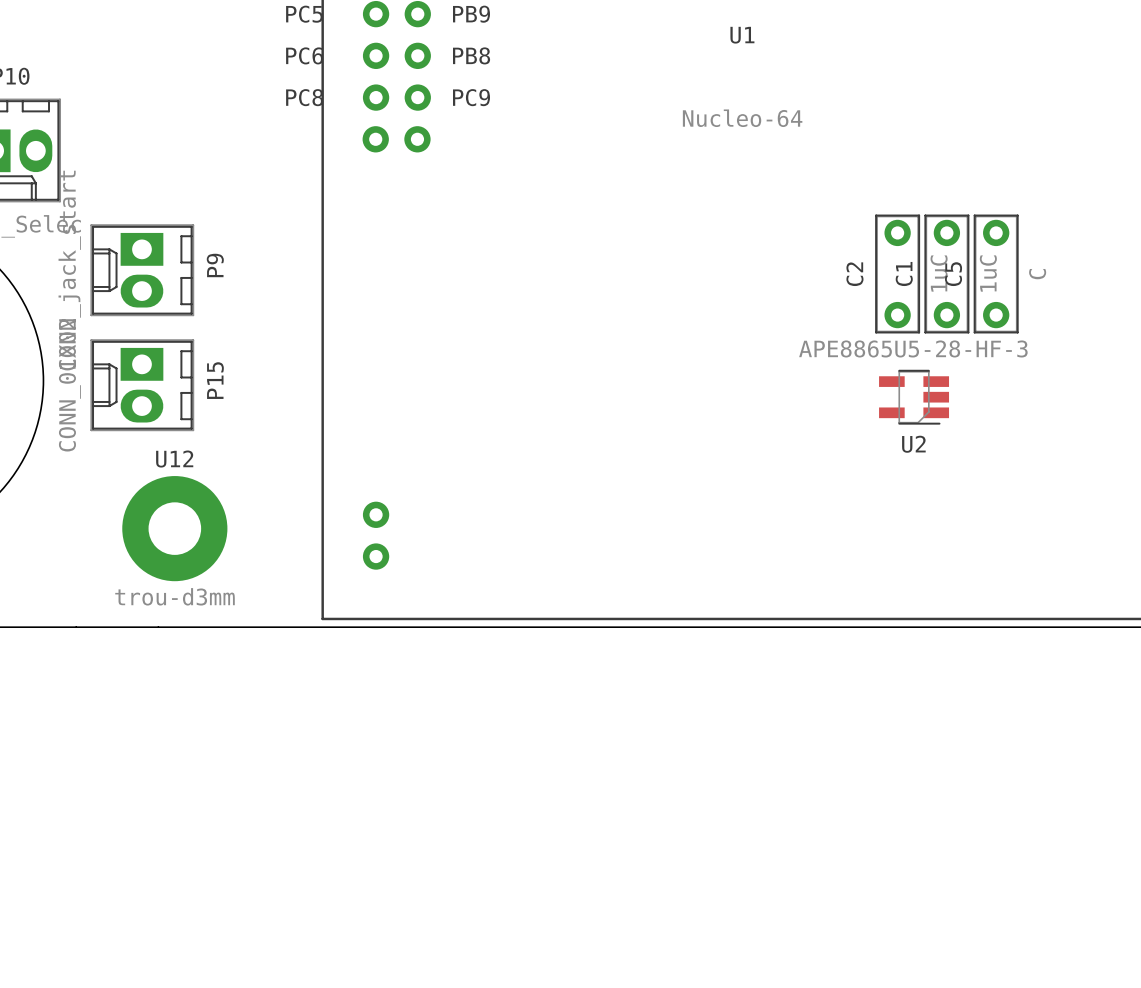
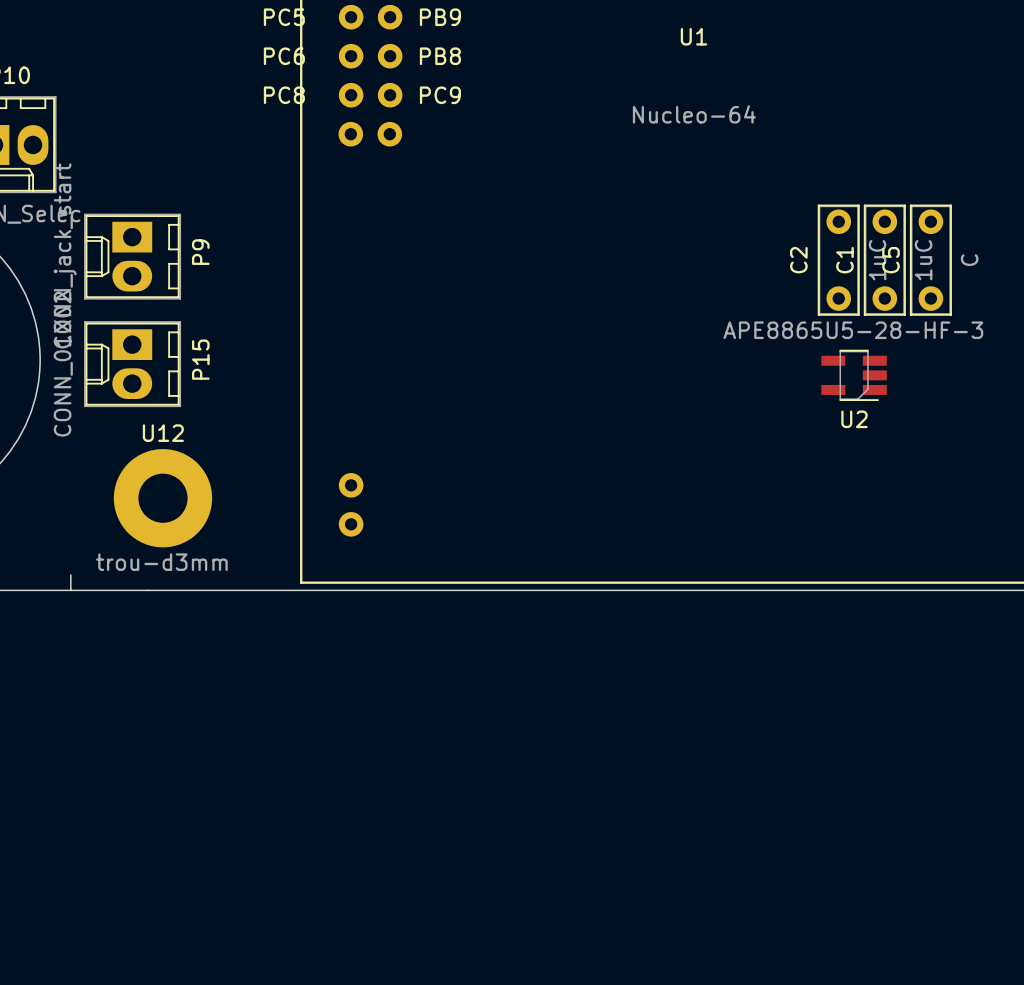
board edge: none -> (70, 575) (70, 590)

